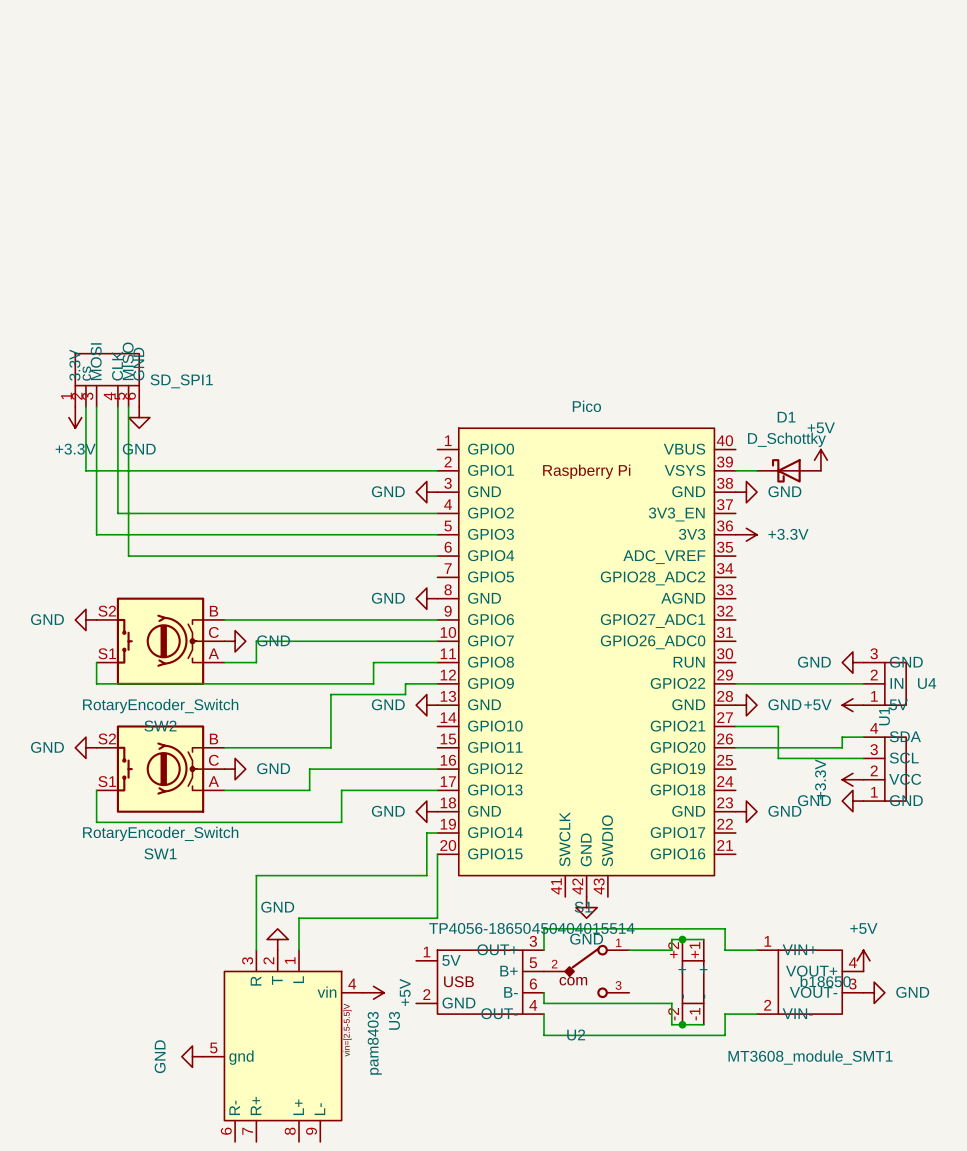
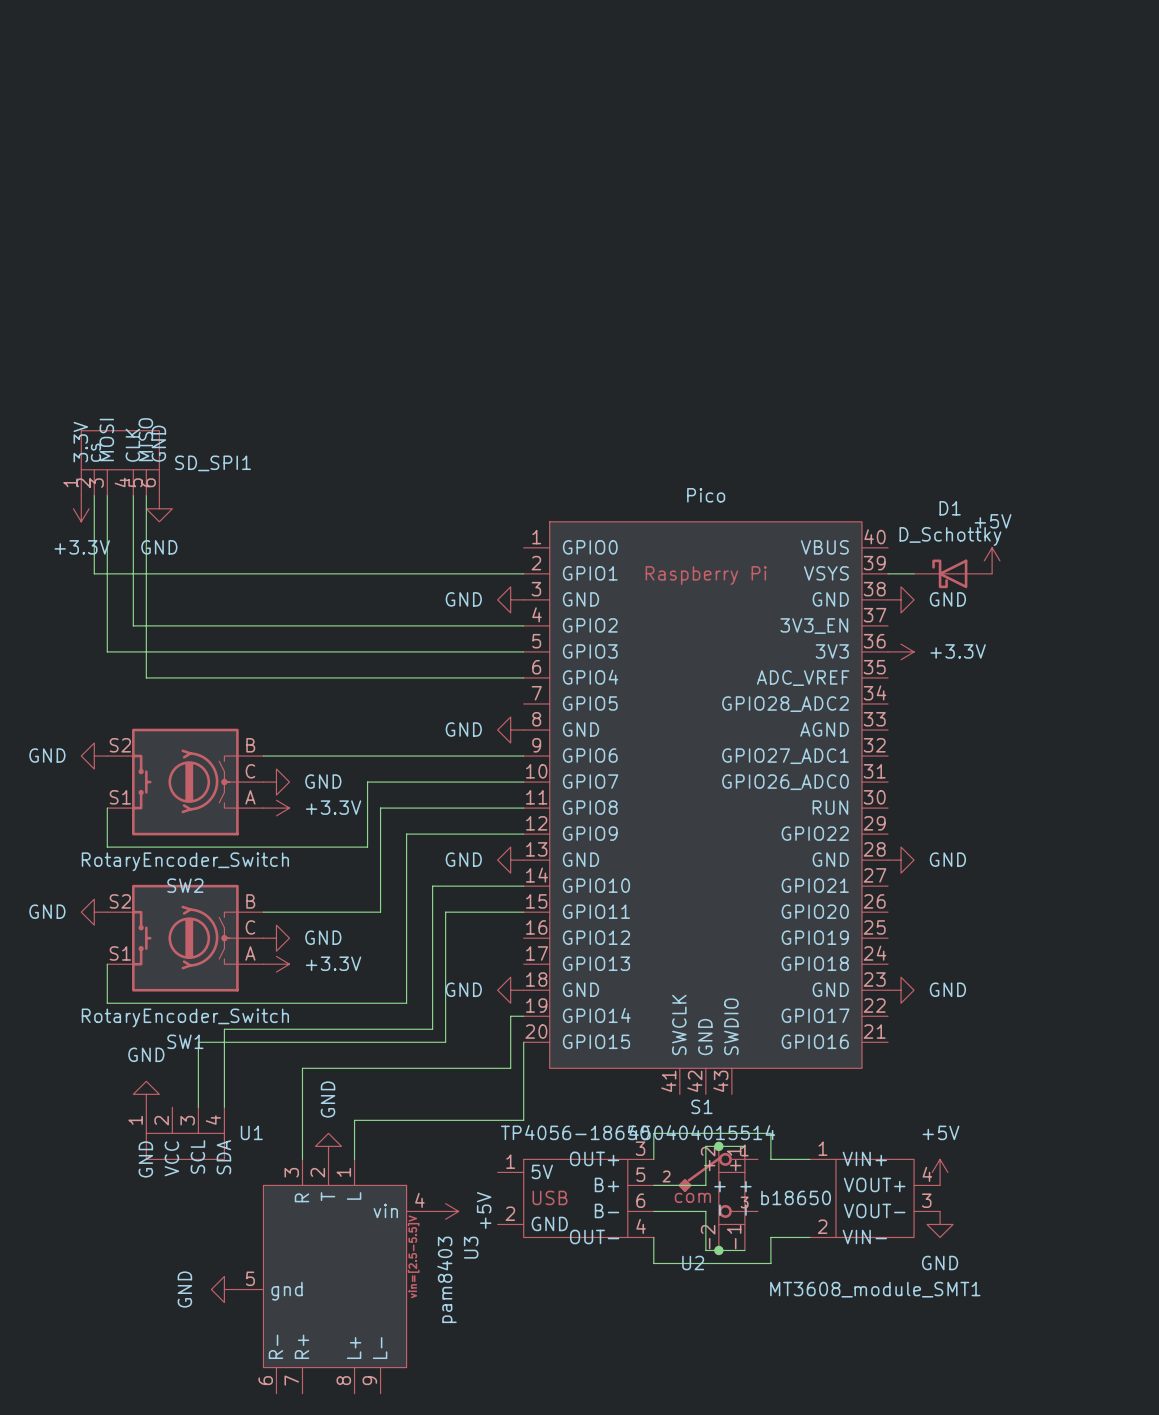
wire: (309, 641) (256, 641) (256, 662) (224, 662) -> none
power symbol: none -> +3.3V (276, 808)
wire: (373, 662) (373, 683) -> (484, 834) (445, 834)
power symbol: GND (852, 662) -> none
wire: (96, 683) (341, 683) -> (107, 834) (107, 847) (367, 847) (367, 782)
wire: (405, 683) (405, 694) (330, 694) (330, 747) (320, 747) -> (445, 808) (380, 808) (380, 912)
wire: (735, 683) (863, 683) -> none
U4: (884, 683) -> none
power symbol: +5V (852, 705) -> none
wire: none -> (523, 886) (432, 886) (432, 1029) (224, 1029) (224, 1107)
wire: (735, 726) (778, 726) (778, 758) (863, 758) -> none
wire: (863, 737) (842, 737) (842, 747) (735, 747) -> none
wire: none -> (523, 912) (445, 912) (445, 1042) (198, 1042) (198, 1107)
wire: (437, 769) (309, 769) (309, 790) (224, 790) -> none
U1 position: (884, 769) -> (185, 1133)
U1 rotation: 0° (895, 769) -> 90° clockwise (185, 1146)
power symbol: +3.3V (852, 779) -> none
power symbol: none -> +3.3V (276, 964)
wire: (341, 790) (437, 790) -> (406, 964) (406, 834)
power symbol: GND (852, 801) -> none
power symbol: none -> GND (146, 1094)
power symbol text rotation: 0° (277, 907) -> 90° counterclockwise (328, 1099)
power symbol: GND (586, 907) -> none
wire: (639, 928) (725, 928) (725, 950) (757, 950) -> none
junction: none -> (718, 1146)
wire: none -> (744, 1146) (705, 1146) (705, 1185) (653, 1185)
junction: (682, 939) -> none
wire: (703, 939) (671, 939) (671, 950) -> none
wire: (629, 950) (639, 950) -> (770, 1133) (770, 1159)
power symbol position: +5V (863, 960) -> +5V (940, 1172)
b18650 name position: b18650 (825, 981) -> b18650 (796, 1197)
b18650 position: (693, 982) -> (731, 1198)
MT3608_module_SMT1 position: (810, 982) -> (875, 1198)
wire: (544, 992) (544, 1003) (671, 1003) (671, 1024) (703, 1024) -> (653, 1211) (705, 1211) (705, 1250) (744, 1250)
power symbol rotation: 0° (874, 992) -> 90° clockwise (940, 1224)
power symbol position: GND (874, 992) -> GND (940, 1224)
wire: (757, 1014) (725, 1014) (725, 1035) (639, 1035) -> (809, 1237) (770, 1237) (770, 1263)
junction: none -> (718, 1250)
junction: (682, 1024) -> none

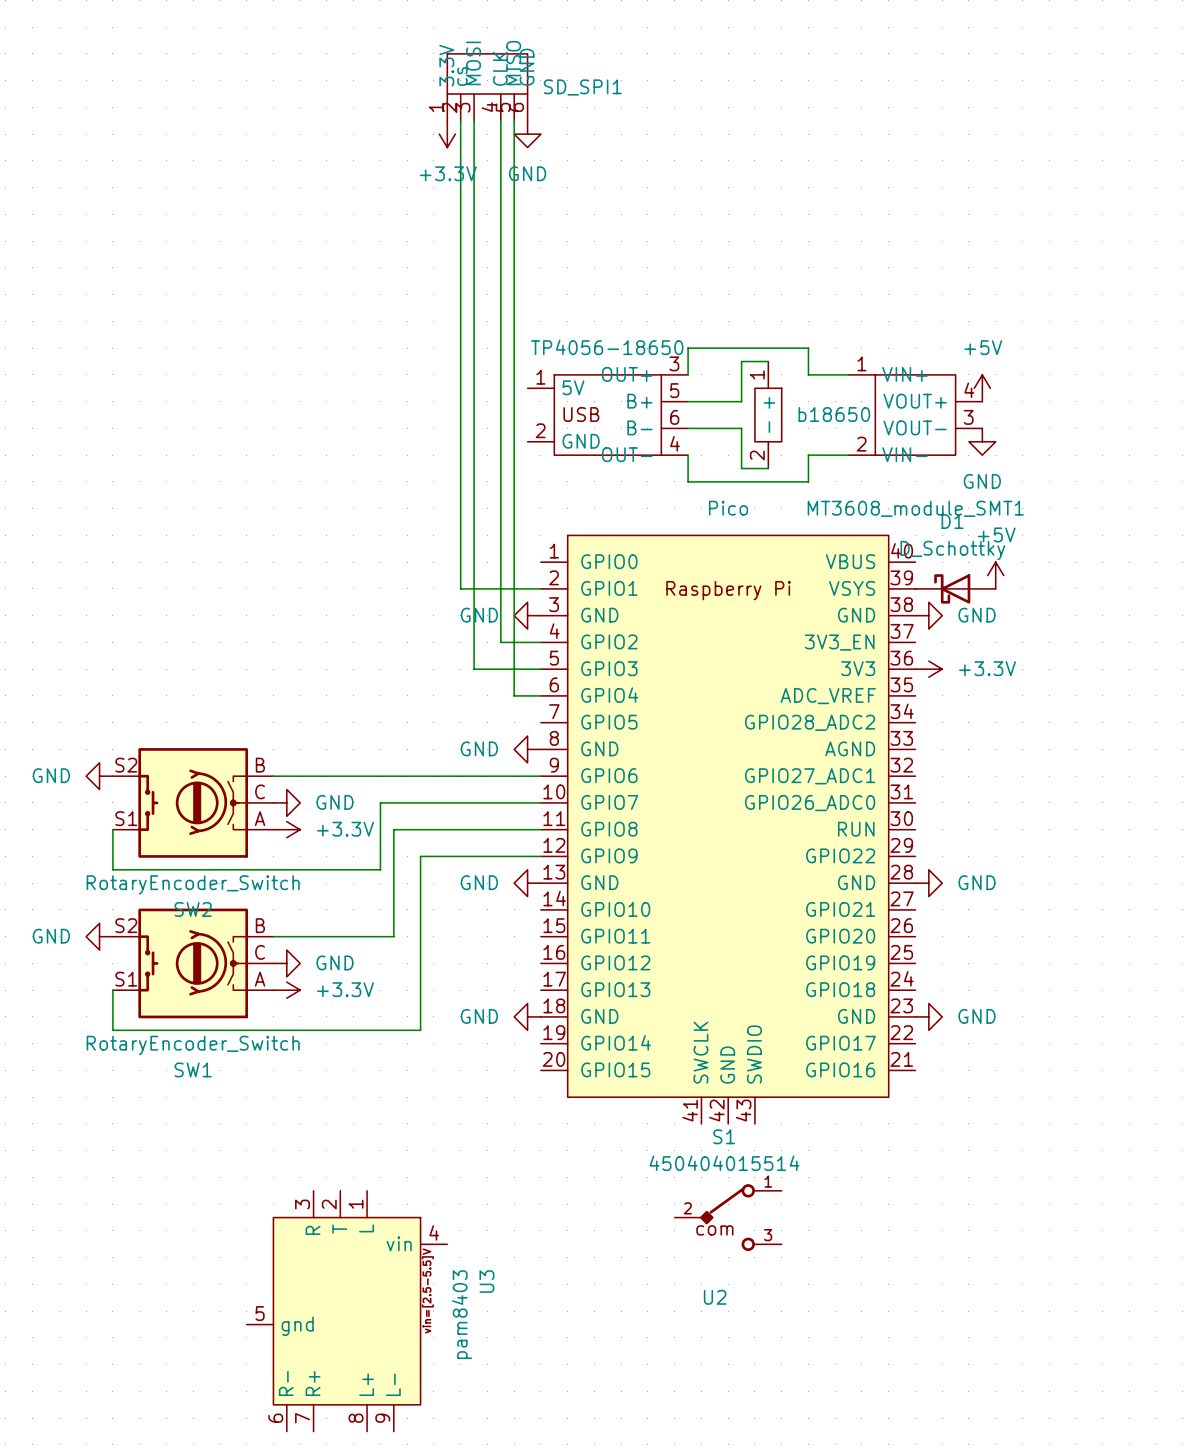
power symbol: none -> +3.3V (447, 134)
power symbol: none -> GND (527, 134)
wire: none -> (768, 361) (741, 361) (741, 401) (688, 401)
wire: none -> (688, 374) (688, 348) (808, 348) (808, 374) (848, 374)
power symbol: none -> +5V (982, 388)
wire: none -> (688, 428) (741, 428) (741, 468) (768, 468)
power symbol: none -> GND (982, 441)
wire: none -> (688, 455) (688, 481) (808, 481) (808, 455) (848, 455)
SD_SPI1 position: (120, 463) -> (487, 87)
wire: (94, 495) (94, 573) (445, 573) -> (460, 120) (460, 588)
wire: (107, 495) (107, 651) (458, 651) -> (474, 120) (474, 669)
wire: (133, 495) (133, 625) (484, 625) -> (500, 120) (500, 642)
wire: (146, 495) (146, 677) (497, 677) -> (514, 120) (514, 695)
power symbol: +3.3V (81, 508) -> none
power symbol: GND (159, 508) -> none
power symbol position: +5V (992, 560) -> +5V (995, 575)
D1 position: (953, 573) -> (955, 588)
wire: (523, 886) (432, 886) (432, 1029) (224, 1029) (224, 1107) -> none
wire: (523, 912) (445, 912) (445, 1042) (198, 1042) (198, 1107) -> none
wire: (523, 1016) (510, 1016) (510, 1068) (302, 1068) (302, 1159) -> none
wire: (523, 1042) (523, 1120) (354, 1120) (354, 1159) -> none
power symbol: GND (146, 1094) -> none
U1: (185, 1133) -> none
power symbol: GND (328, 1146) -> none
junction: (718, 1146) -> none
b18650 symbol: [718, 1146, 745, 1251] -> [754, 361, 782, 469]
wire: (744, 1146) (705, 1146) (705, 1185) (653, 1185) -> none
wire: (653, 1159) (653, 1133) (770, 1133) (770, 1159) (809, 1159) -> none
power symbol: +5V (940, 1172) -> none
TP4056-18650 position: (575, 1198) -> (607, 415)
MT3608_module_SMT1 position: (875, 1198) -> (915, 415)
power symbol: +5V (445, 1211) -> none
wire: (653, 1211) (705, 1211) (705, 1250) (744, 1250) -> none
power symbol: GND (940, 1224) -> none
wire: (653, 1237) (653, 1263) (770, 1263) (770, 1237) (809, 1237) -> none
junction: (718, 1250) -> none
power symbol: GND (224, 1289) -> none

